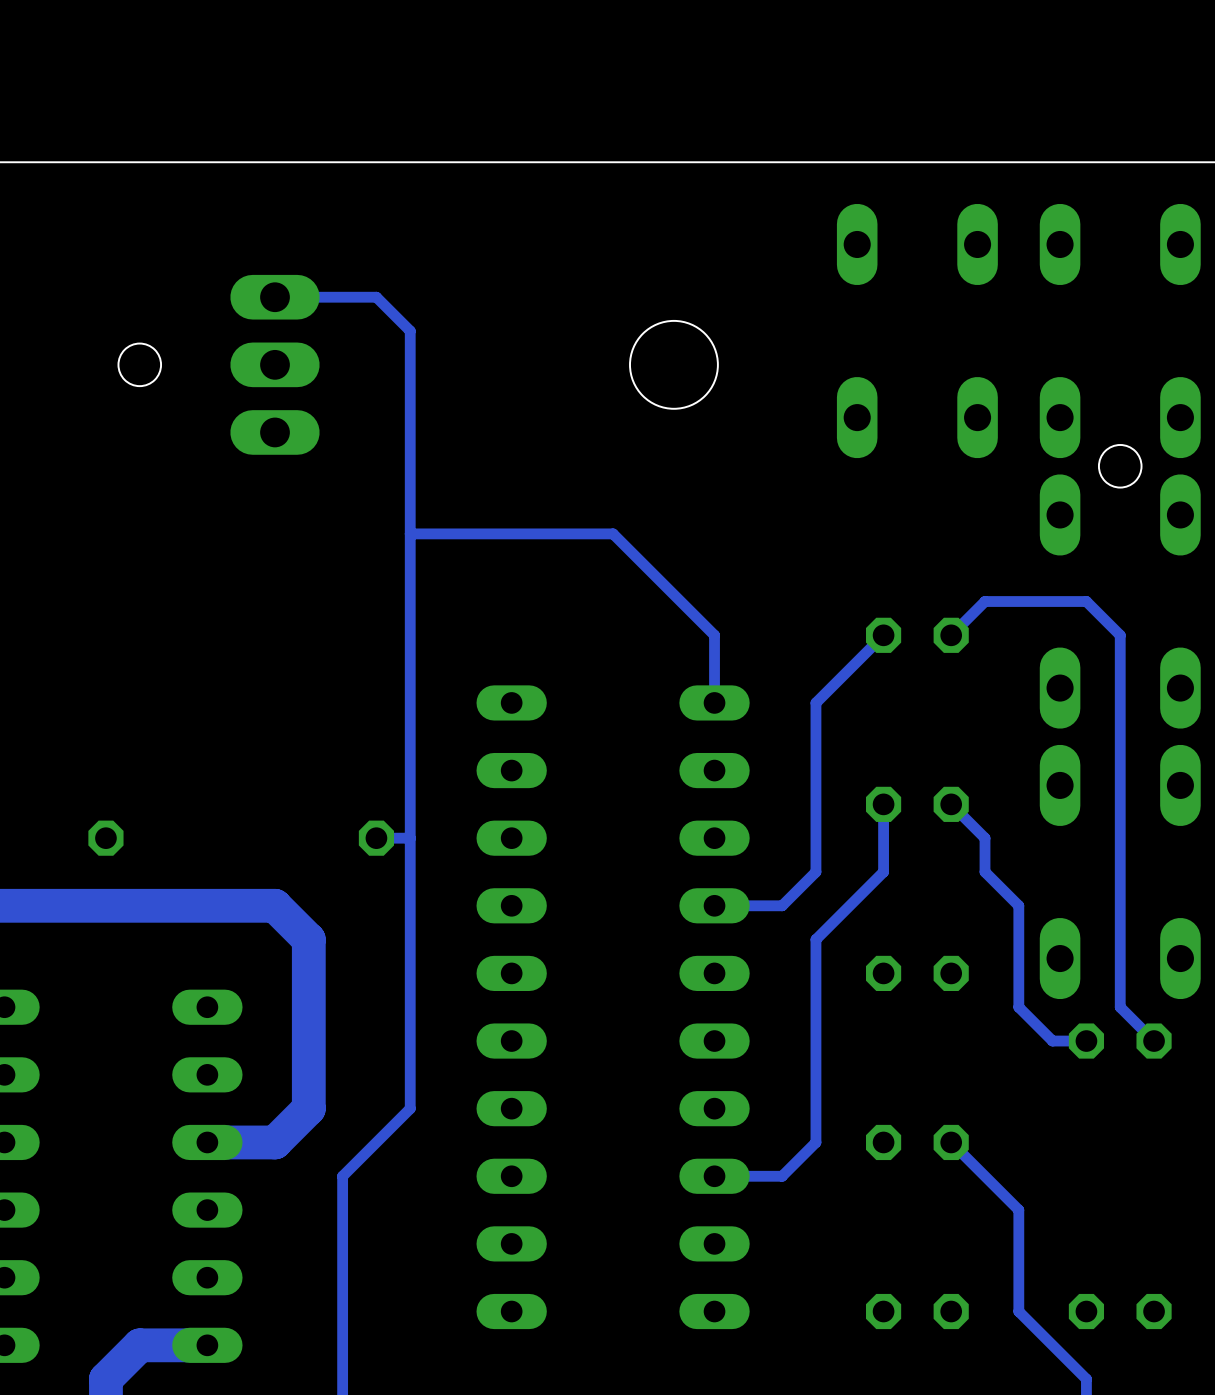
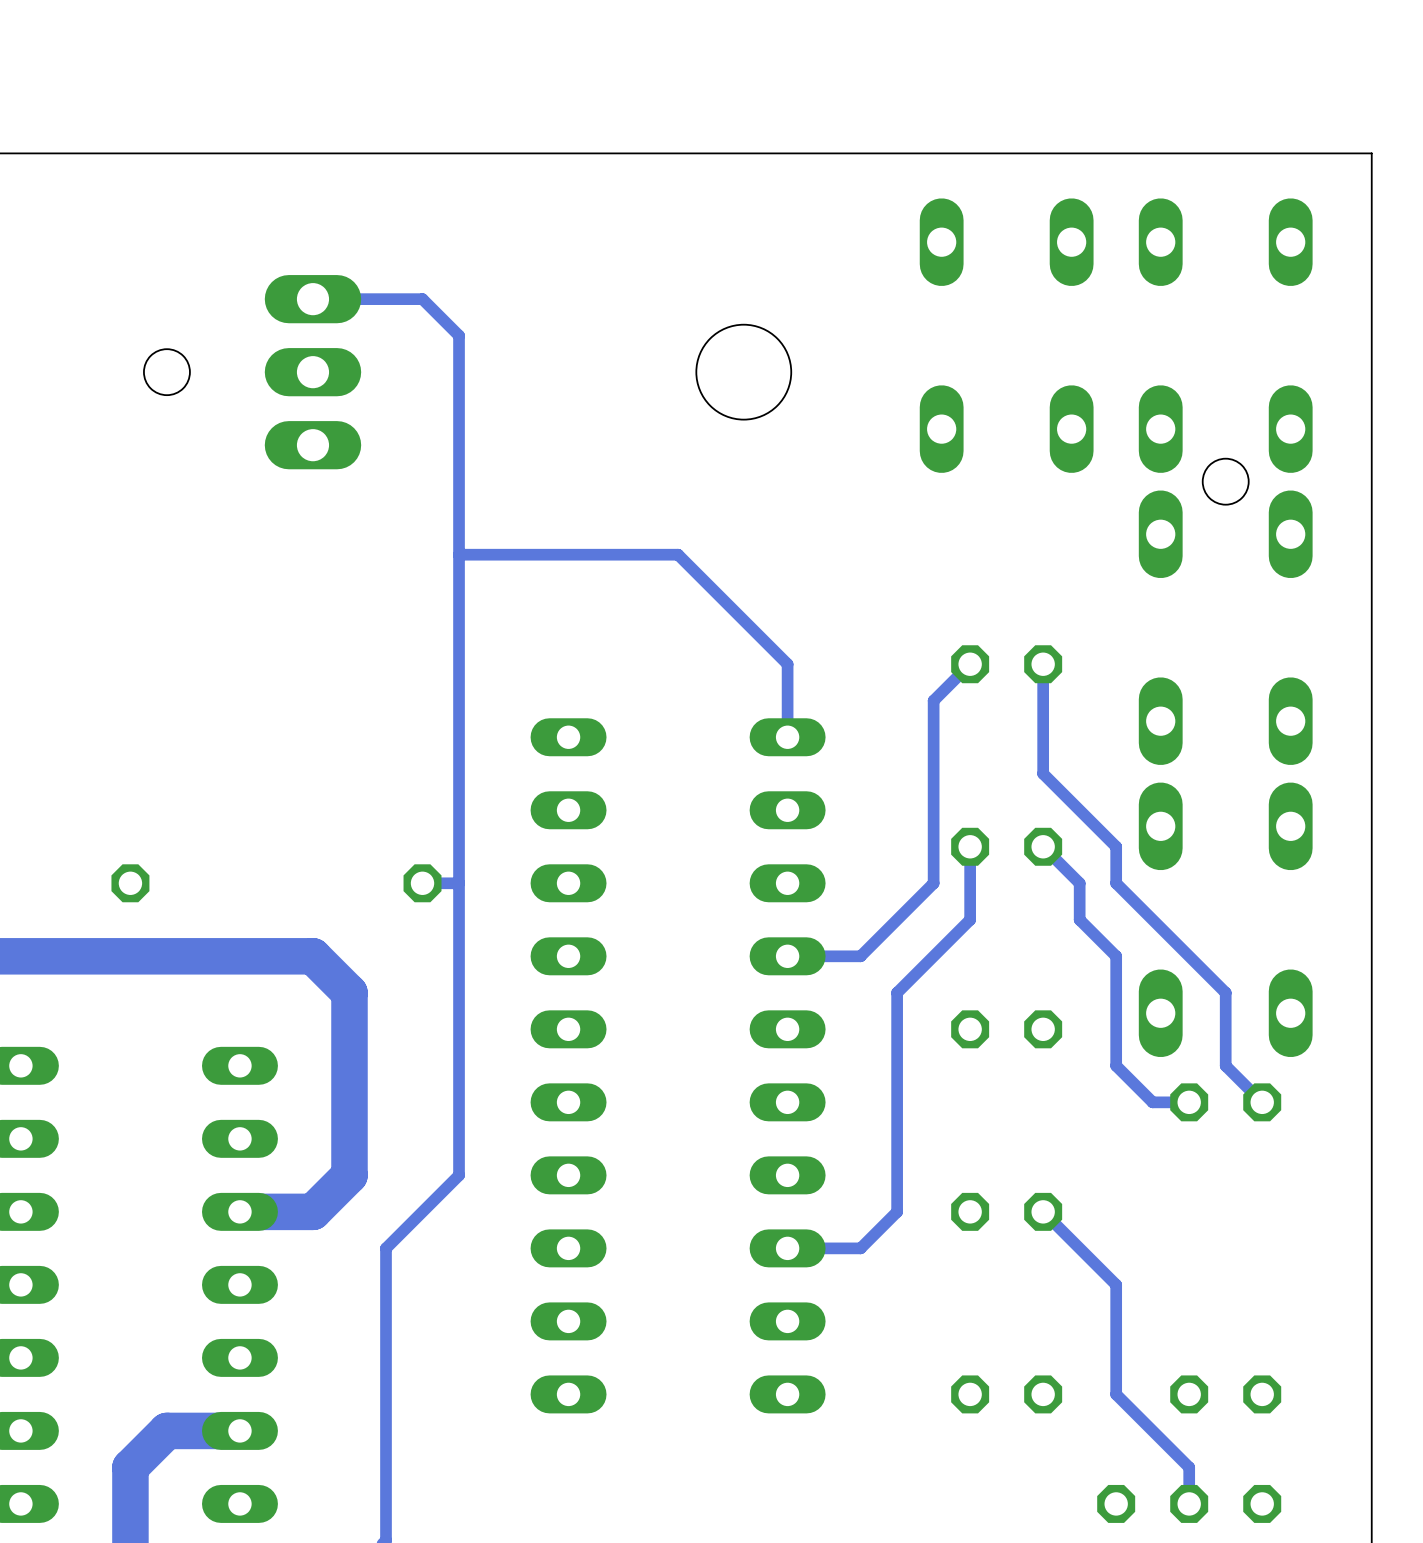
track: (951, 635) (985, 601) (1086, 601) (1120, 635) (1120, 939) -> (1043, 664) (1043, 773) (1116, 846) (1116, 883) (1225, 992)
track: (849, 669) (815, 702) (815, 871) -> (933, 700) (933, 883) (897, 919)

